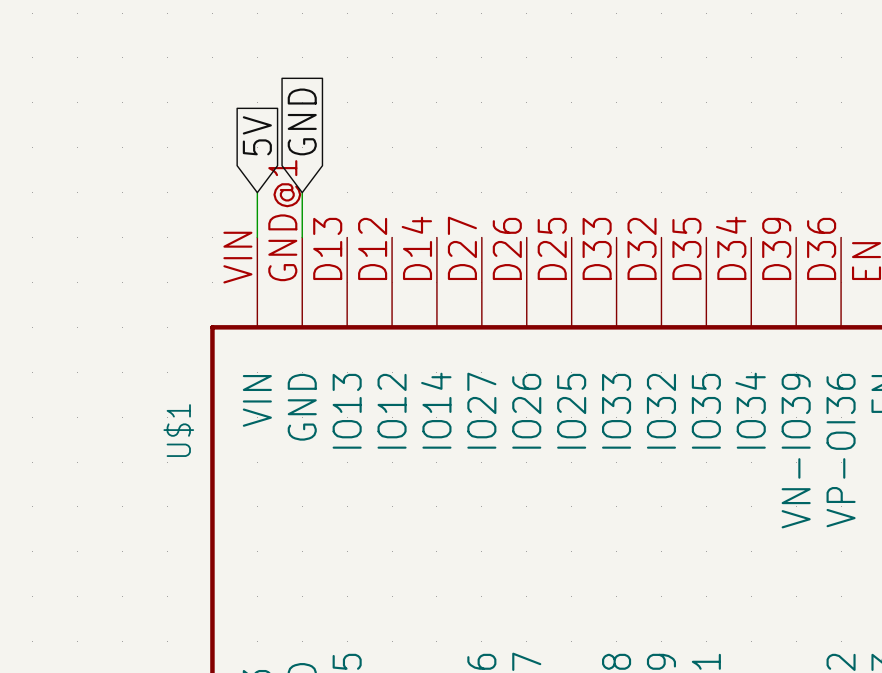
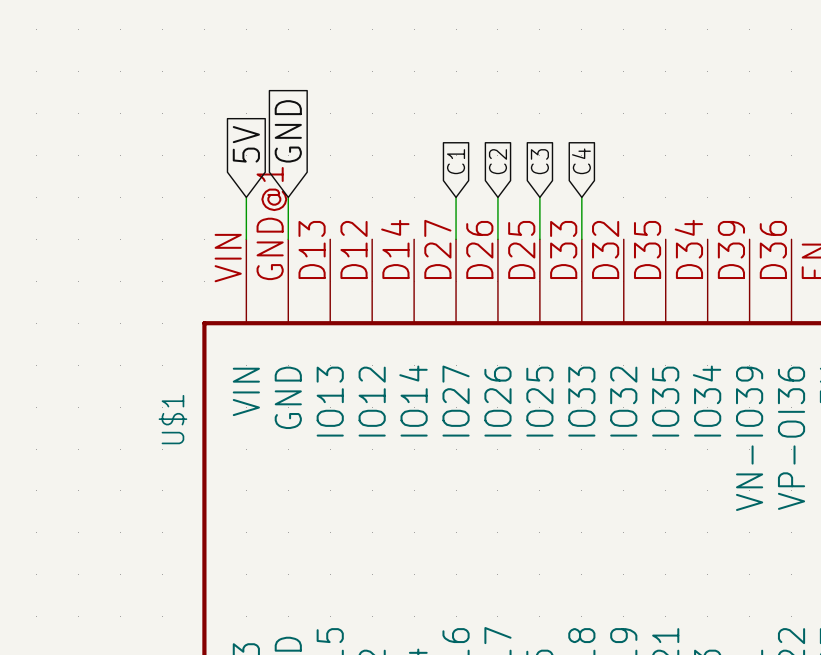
global label: none -> C4 (581, 161)
global label: none -> C1 (456, 161)
global label: none -> C2 (497, 161)
global label: none -> C3 (539, 161)
wire: none -> (456, 197) (456, 239)
wire: none -> (497, 197) (497, 239)
wire: none -> (539, 197) (539, 239)
wire: none -> (581, 197) (581, 239)

